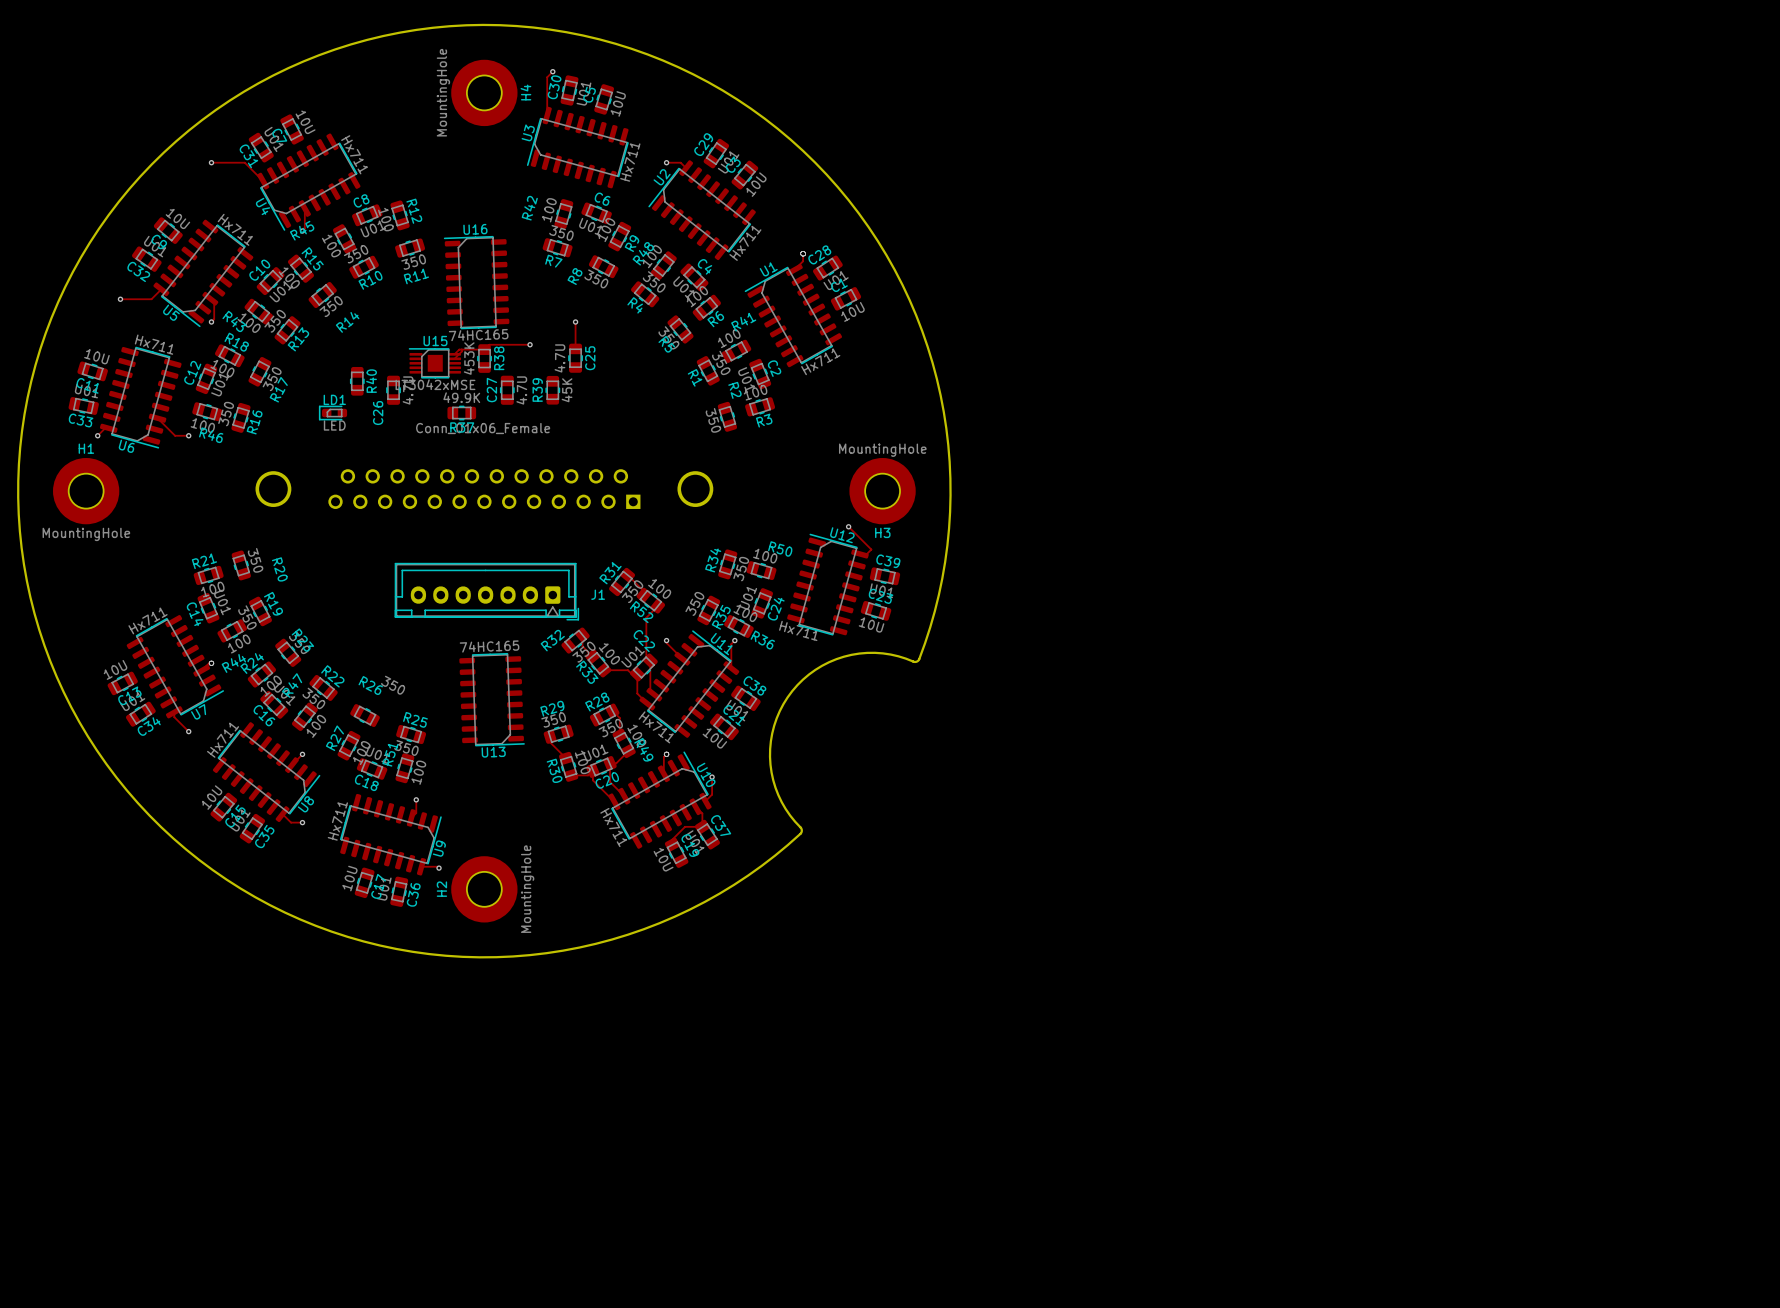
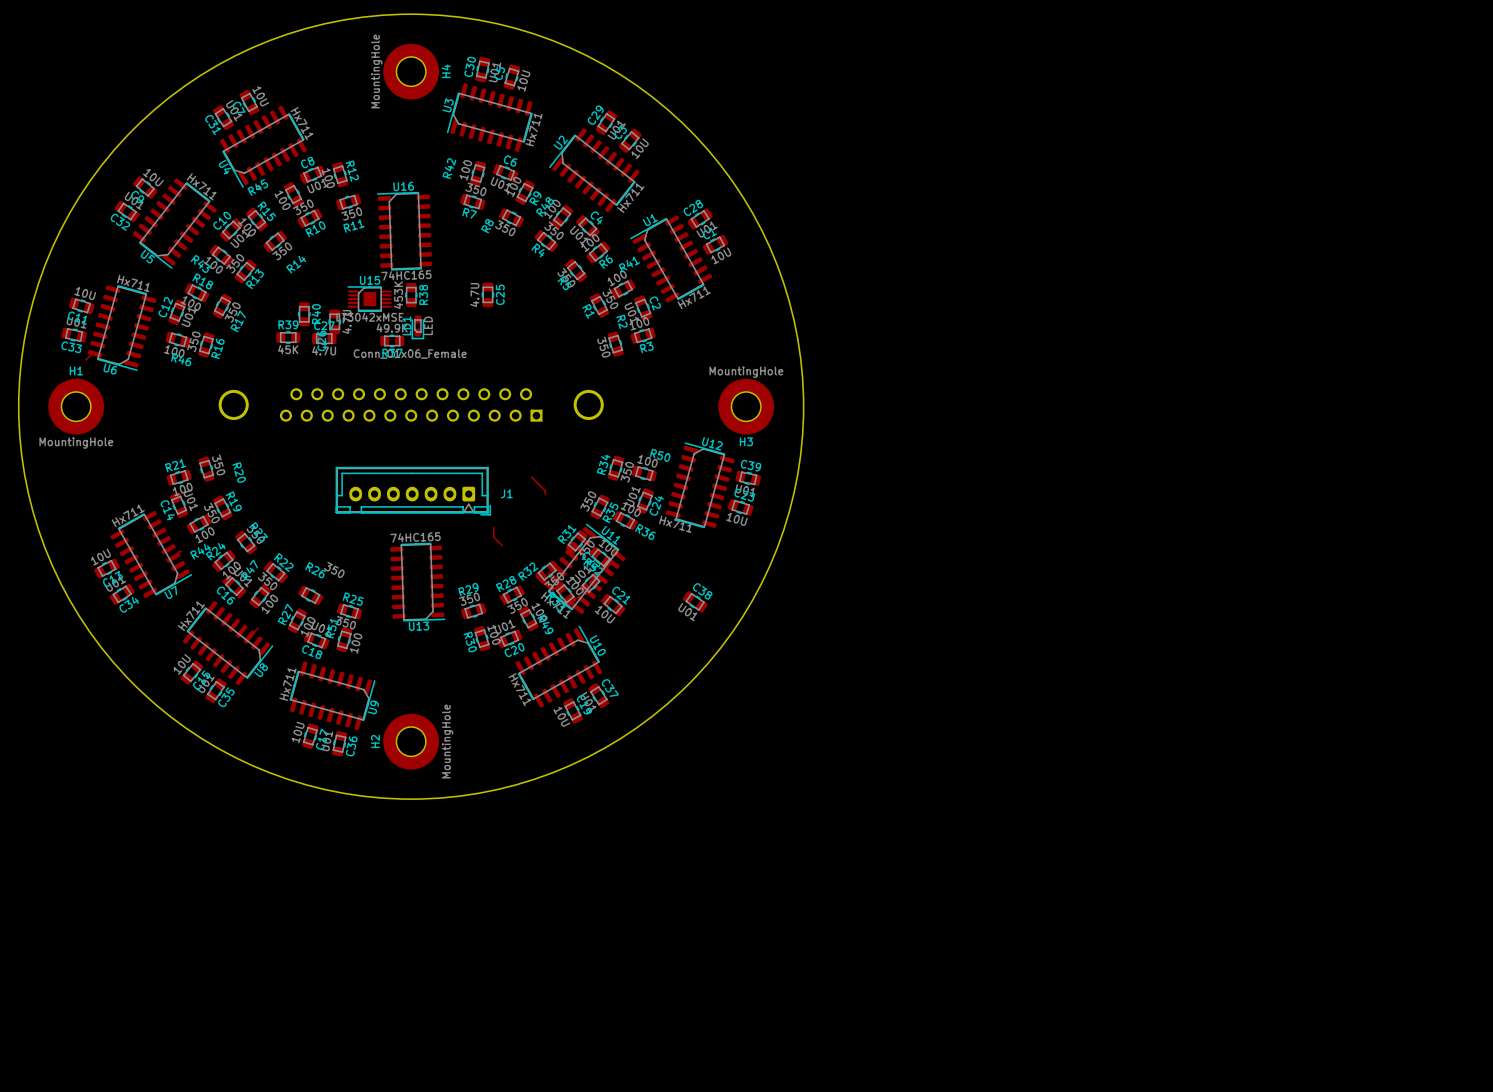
round board edge: none -> [17, 13, 805, 800]
track: (552, 71) (547, 77) (547, 115) -> none
via: (552, 71) -> none
track: (211, 162) (244, 162) (263, 181) -> none
via: (211, 162) -> none
track: (666, 162) (680, 162) (686, 168) -> none
via: (666, 162) -> none
track: (304, 208) (304, 228) (302, 230) -> none
track: (803, 253) (803, 261) (794, 269) -> none
via: (803, 253) -> none
track: (161, 289) (151, 299) (120, 299) -> none
track: (210, 298) (214, 302) (214, 319) (211, 322) -> none
via: (120, 299) -> none
via: (211, 322) -> none
track: (575, 322) (575, 348) -> none
via: (575, 322) -> none
track: (530, 344) (489, 344) (484, 349) (459, 349) (454, 354) -> none
via: (530, 344) -> none
track: (461, 349) (454, 358) -> none
C27 rotation: 0° (507, 390) -> 90° clockwise (324, 338)
C27 position: (507, 390) -> (324, 338)
R39 rotation: 0° (552, 390) -> 90° clockwise (288, 337)
R39 position: (552, 390) -> (288, 337)
LD1 rotation: 0° (333, 413) -> 90° counterclockwise (417, 327)
LD1 position: (333, 413) -> (417, 327)
track: (157, 418) (175, 435) (188, 435) -> none
via: (97, 435) -> none
via: (188, 435) -> none
track: (848, 526) (871, 549) (866, 553) (859, 553) -> none
via: (848, 526) -> none
R31 position: (622, 581) -> (576, 541)
R52 position: (650, 600) -> (601, 557)
track: (657, 606) (646, 617) (646, 656) (650, 660) (650, 690) (654, 694) -> none
R32 position: (575, 640) -> (547, 571)
track: (666, 640) (666, 642) (682, 658) -> none
via: (666, 640) -> none
track: (734, 640) (731, 644) (731, 668) -> none
via: (734, 640) -> none
board edge: (919, 659) (934, 611) (942, 578) (949, 528) (950, 478) (946, 428) (940, 395) (927, 346) (916, 315) (894, 269) (877, 240) (848, 200) (815, 162) (790, 139) (750, 108) (708, 82) (662, 60) (615, 43) (582, 35) (533, 27) (483, 24) (432, 27) (399, 32) (350, 44) (303, 61) (258, 83) (215, 110) (189, 130) (151, 164) (118, 201) (98, 228) (72, 272) (51, 317) (40, 349) (27, 397) (20, 447) (18, 497) (19, 531) (26, 580) (39, 629) (56, 676) (79, 721) (106, 764) (127, 790) (161, 827) (199, 860) (226, 879) (269, 905) (315, 925) (363, 941) (396, 948) (446, 955) (496, 957) (546, 953) (579, 947) (628, 934) (674, 916) (705, 901) (747, 875) (801, 832) (801, 828) (790, 815) (778, 795) (773, 780) (770, 756) (770, 741) (776, 718) (783, 704) (797, 685) (822, 665) (851, 654) (875, 652) (898, 656) (914, 661) (919, 659) -> none
via: (211, 663) -> none
R33 position: (598, 663) -> (565, 593)
C22 position: (643, 667) -> (591, 583)
track: (604, 670) (627, 670) (631, 674) (637, 674) (637, 693) (647, 703) -> none
C38 position: (745, 698) -> (695, 601)
track: (612, 710) (619, 718) (619, 735) -> none
track: (174, 712) (174, 717) (188, 731) -> none
via: (188, 731) -> none
track: (550, 736) (550, 742) (566, 758) -> none
track: (628, 751) (616, 763) (610, 763) (610, 781) (624, 796) -> none
via: (302, 754) -> none
track: (666, 754) (663, 757) (663, 773) -> none
via: (666, 754) -> none
track: (571, 775) (588, 775) (592, 770) (592, 780) (614, 801) -> none
track: (712, 777) (712, 794) (705, 801) -> none
via: (712, 777) -> none
track: (416, 799) (416, 813) (411, 817) -> none
via: (416, 799) -> none
track: (695, 806) (702, 813) (702, 826) (685, 826) (672, 839) (672, 844) -> none
track: (282, 814) (291, 822) (302, 822) -> none
via: (302, 822) -> none
track: (421, 866) (439, 868) -> none
via: (439, 868) -> none

